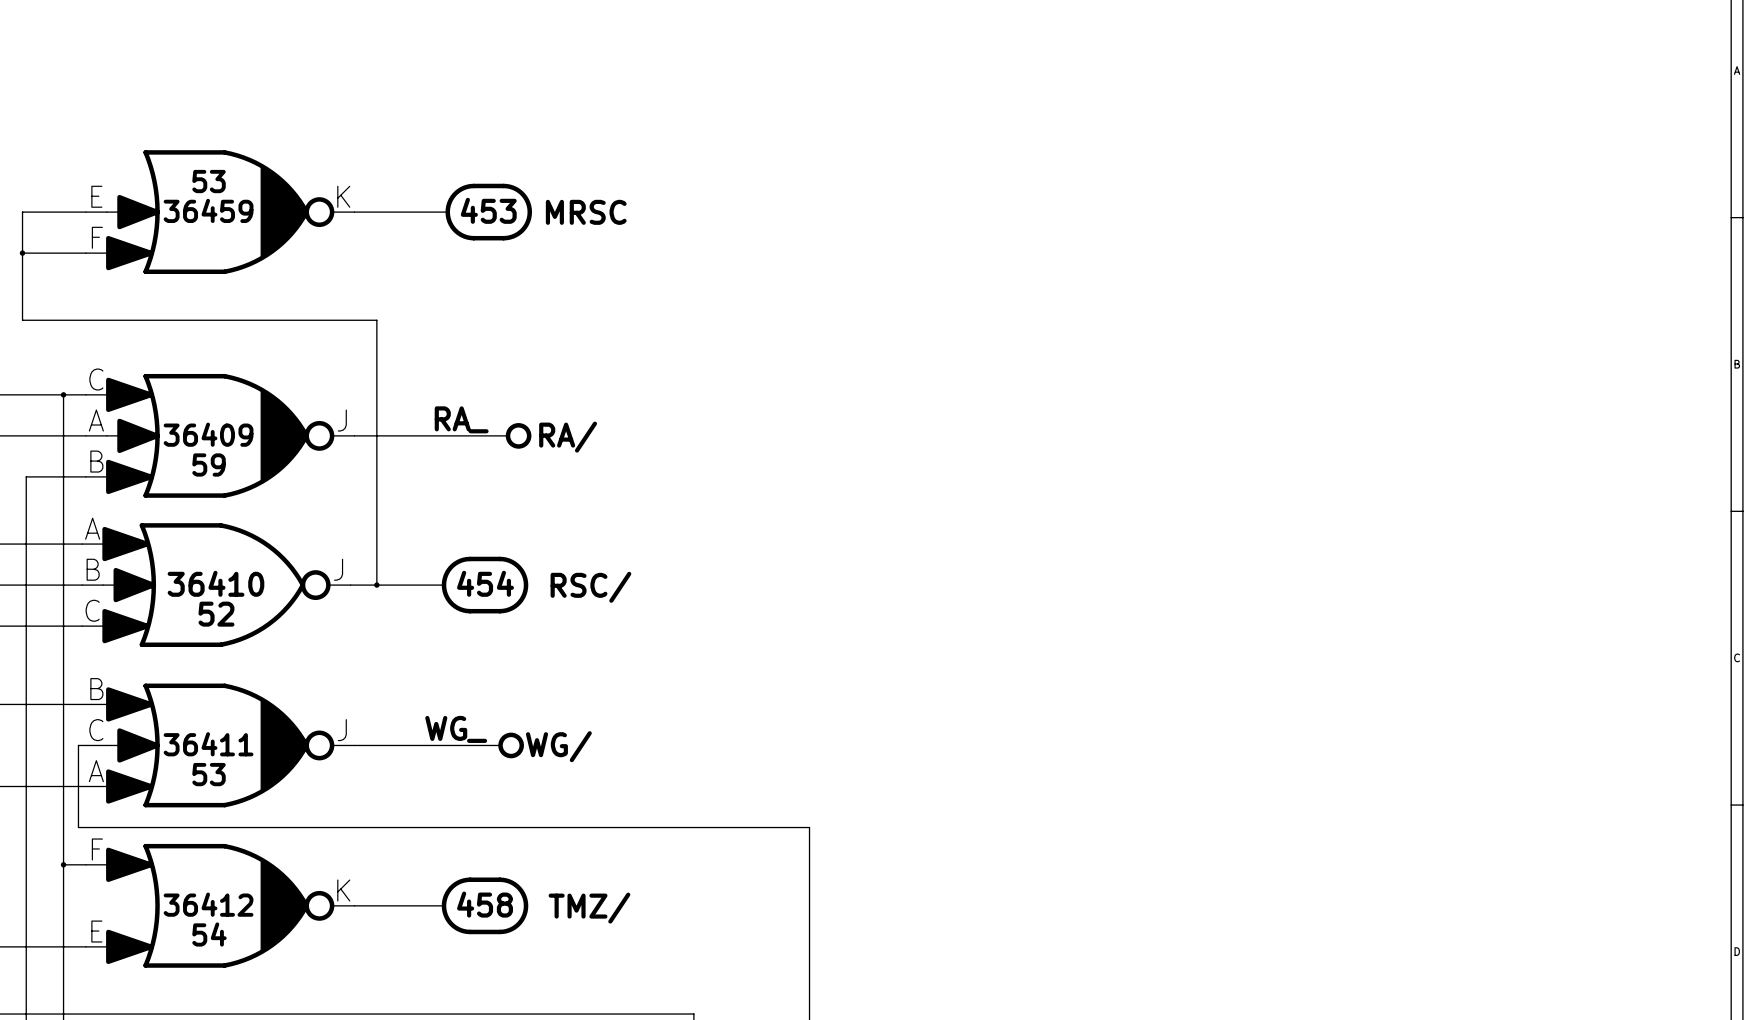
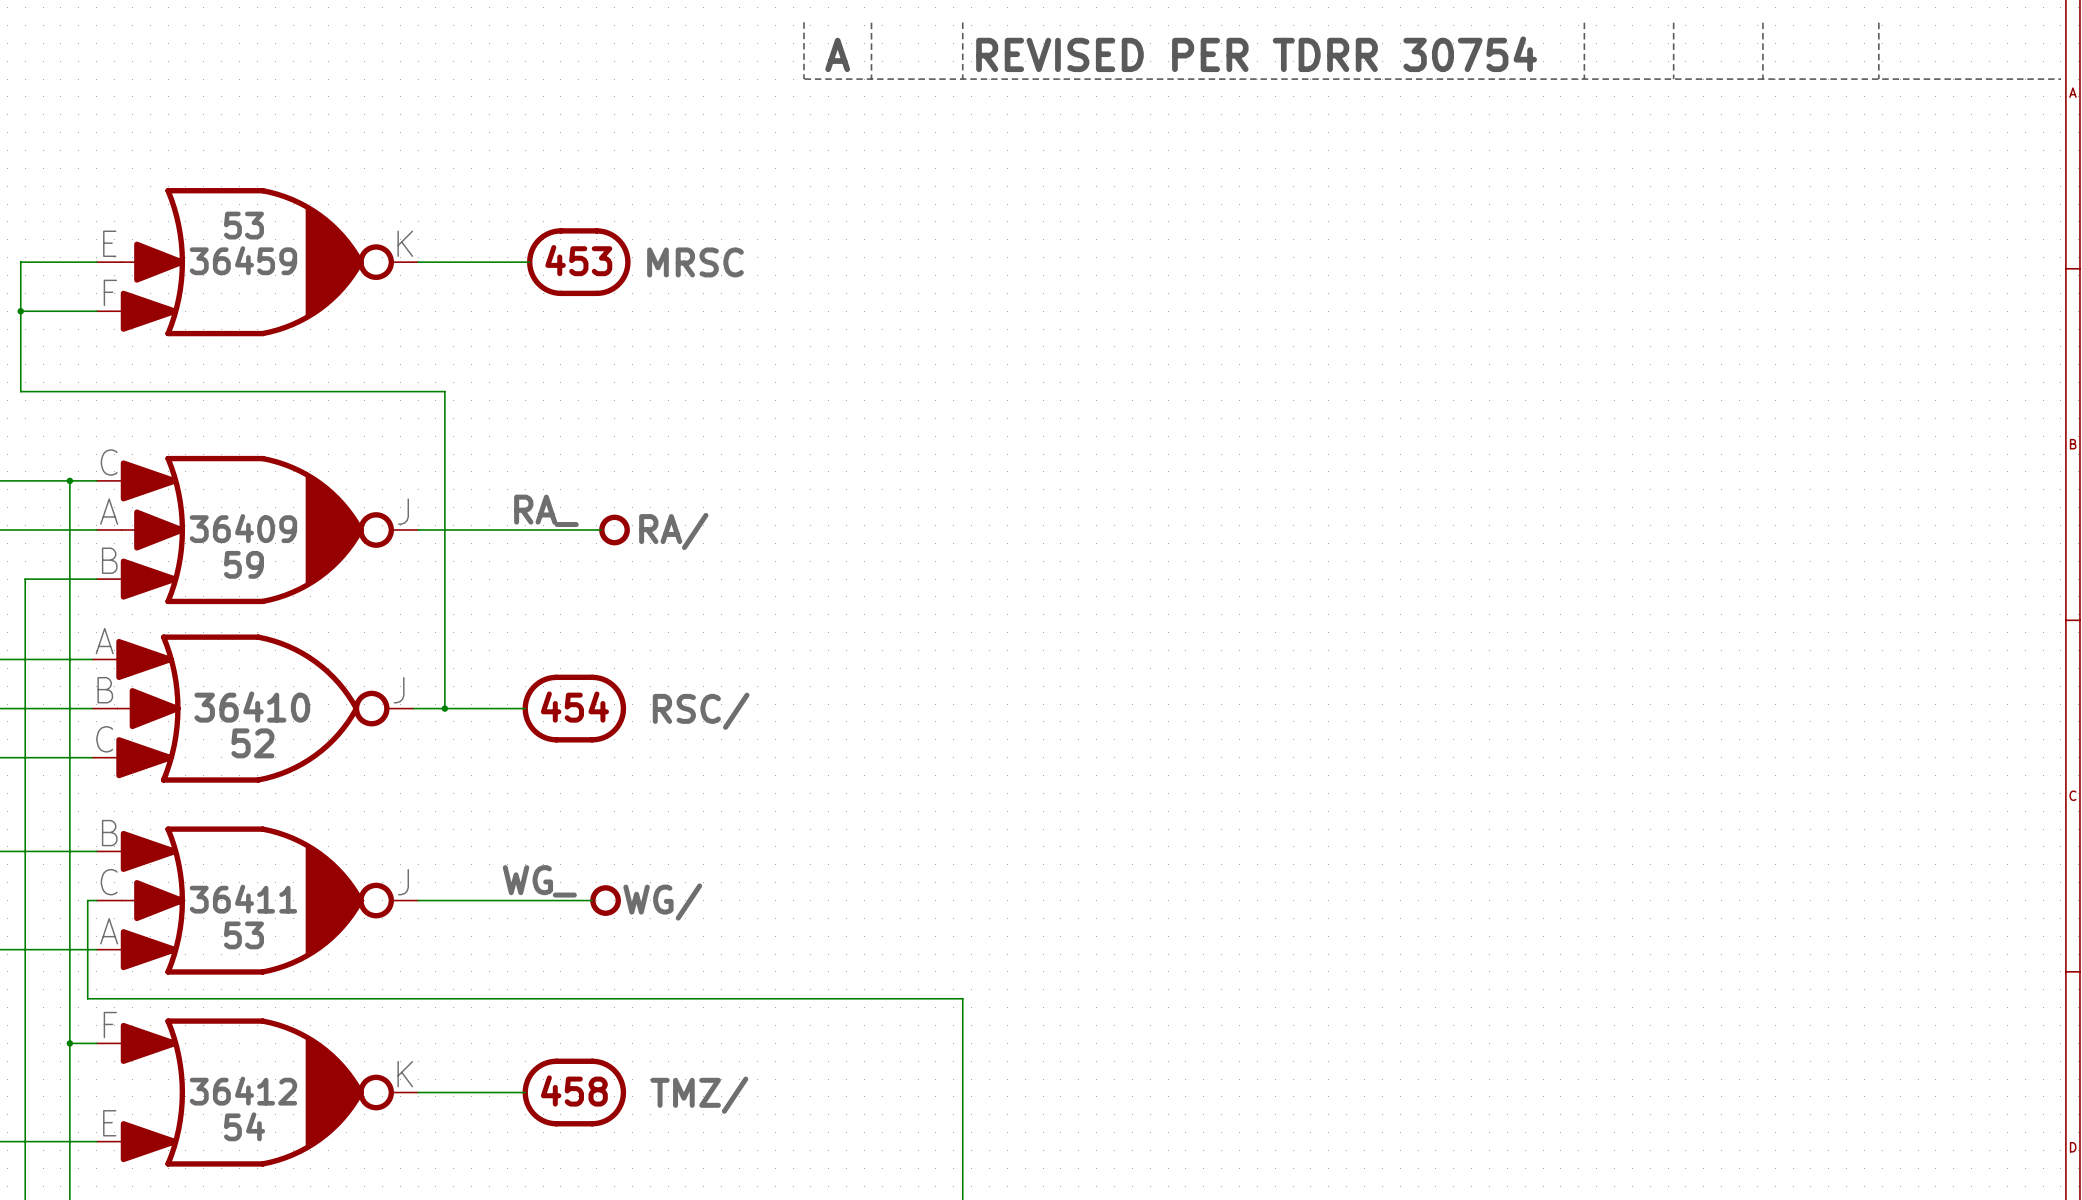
line: none -> (803, 22) (803, 79)
line: none -> (962, 22) (962, 79)
line: none -> (871, 22) (871, 79)
line: none -> (1584, 22) (1584, 78)
line: none -> (1673, 22) (1673, 79)
line: none -> (1762, 22) (1762, 79)
line: none -> (1878, 22) (1878, 79)
text: none -> A (837, 54)
text: none -> REVISED PER TDRR 30754 (1256, 54)
line: none -> (804, 79) (2060, 79)

